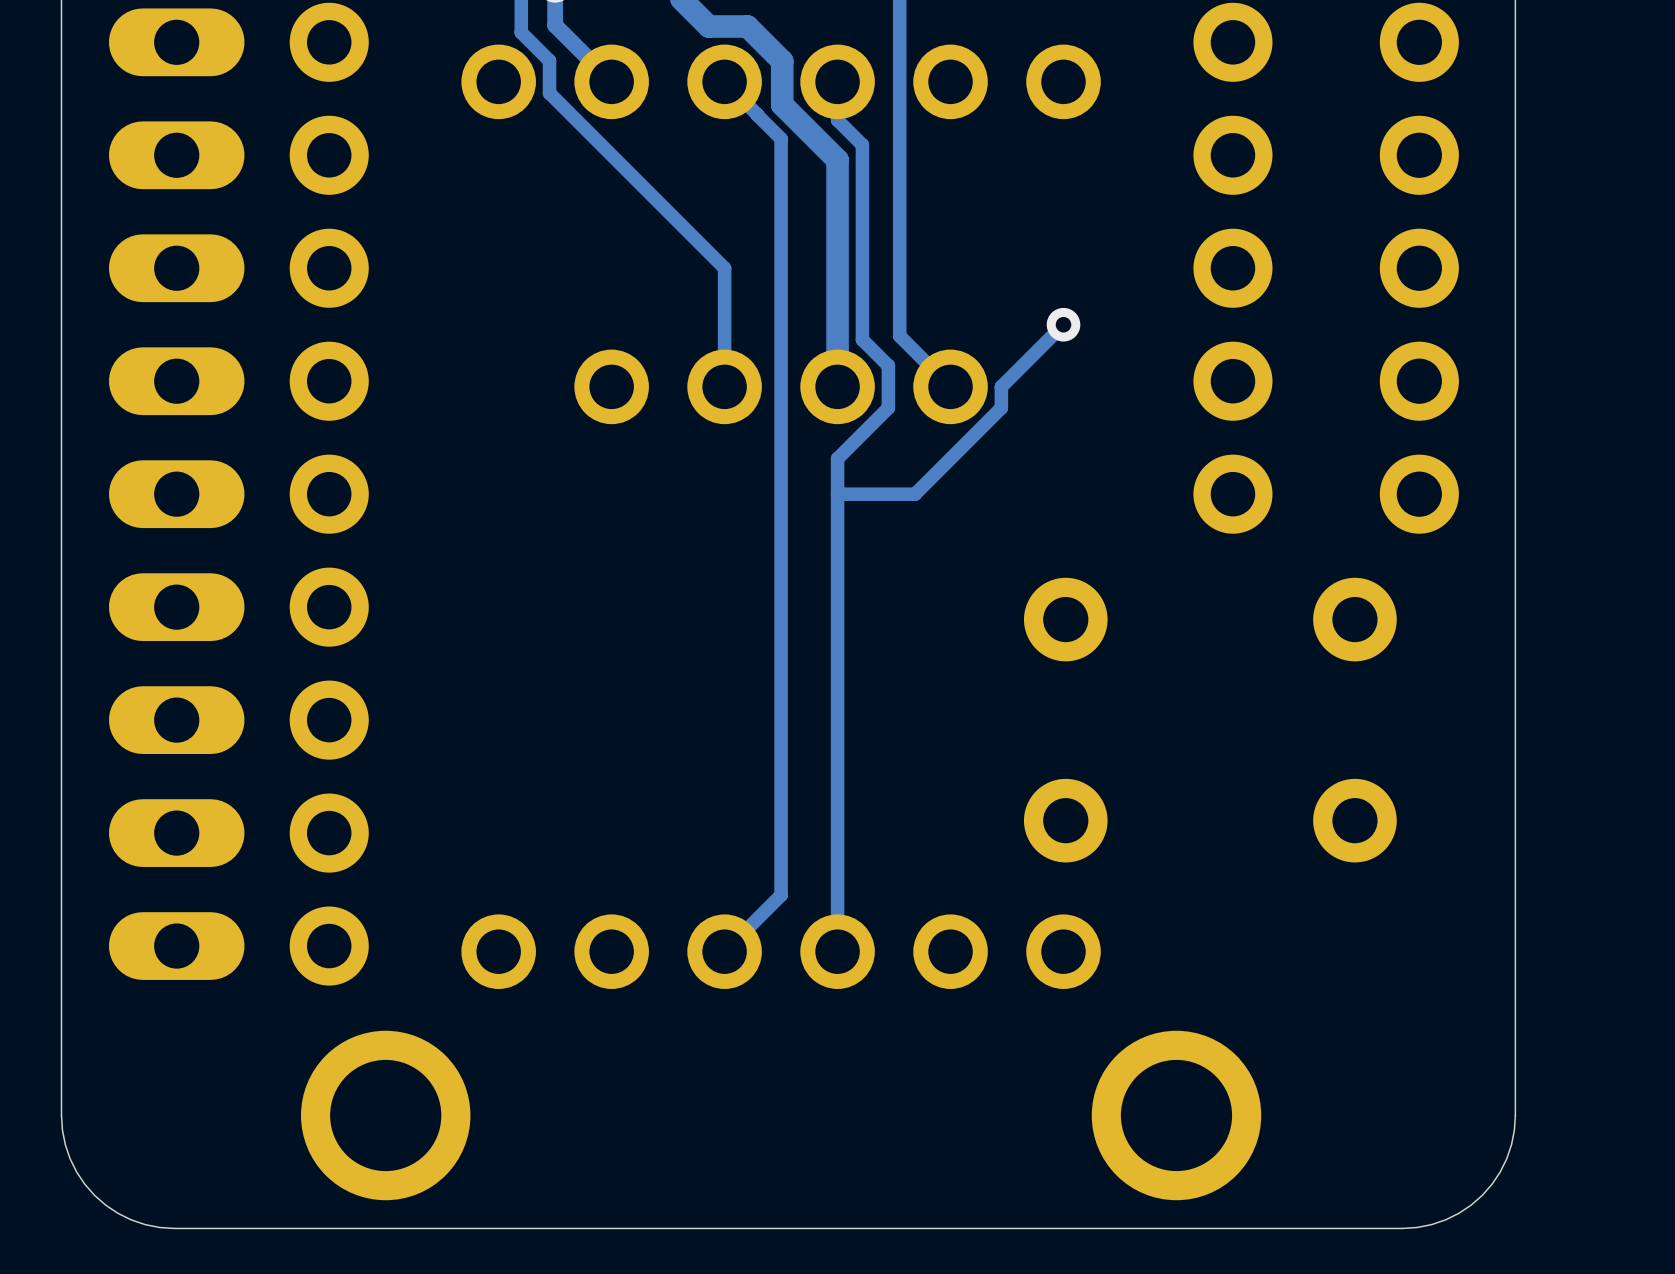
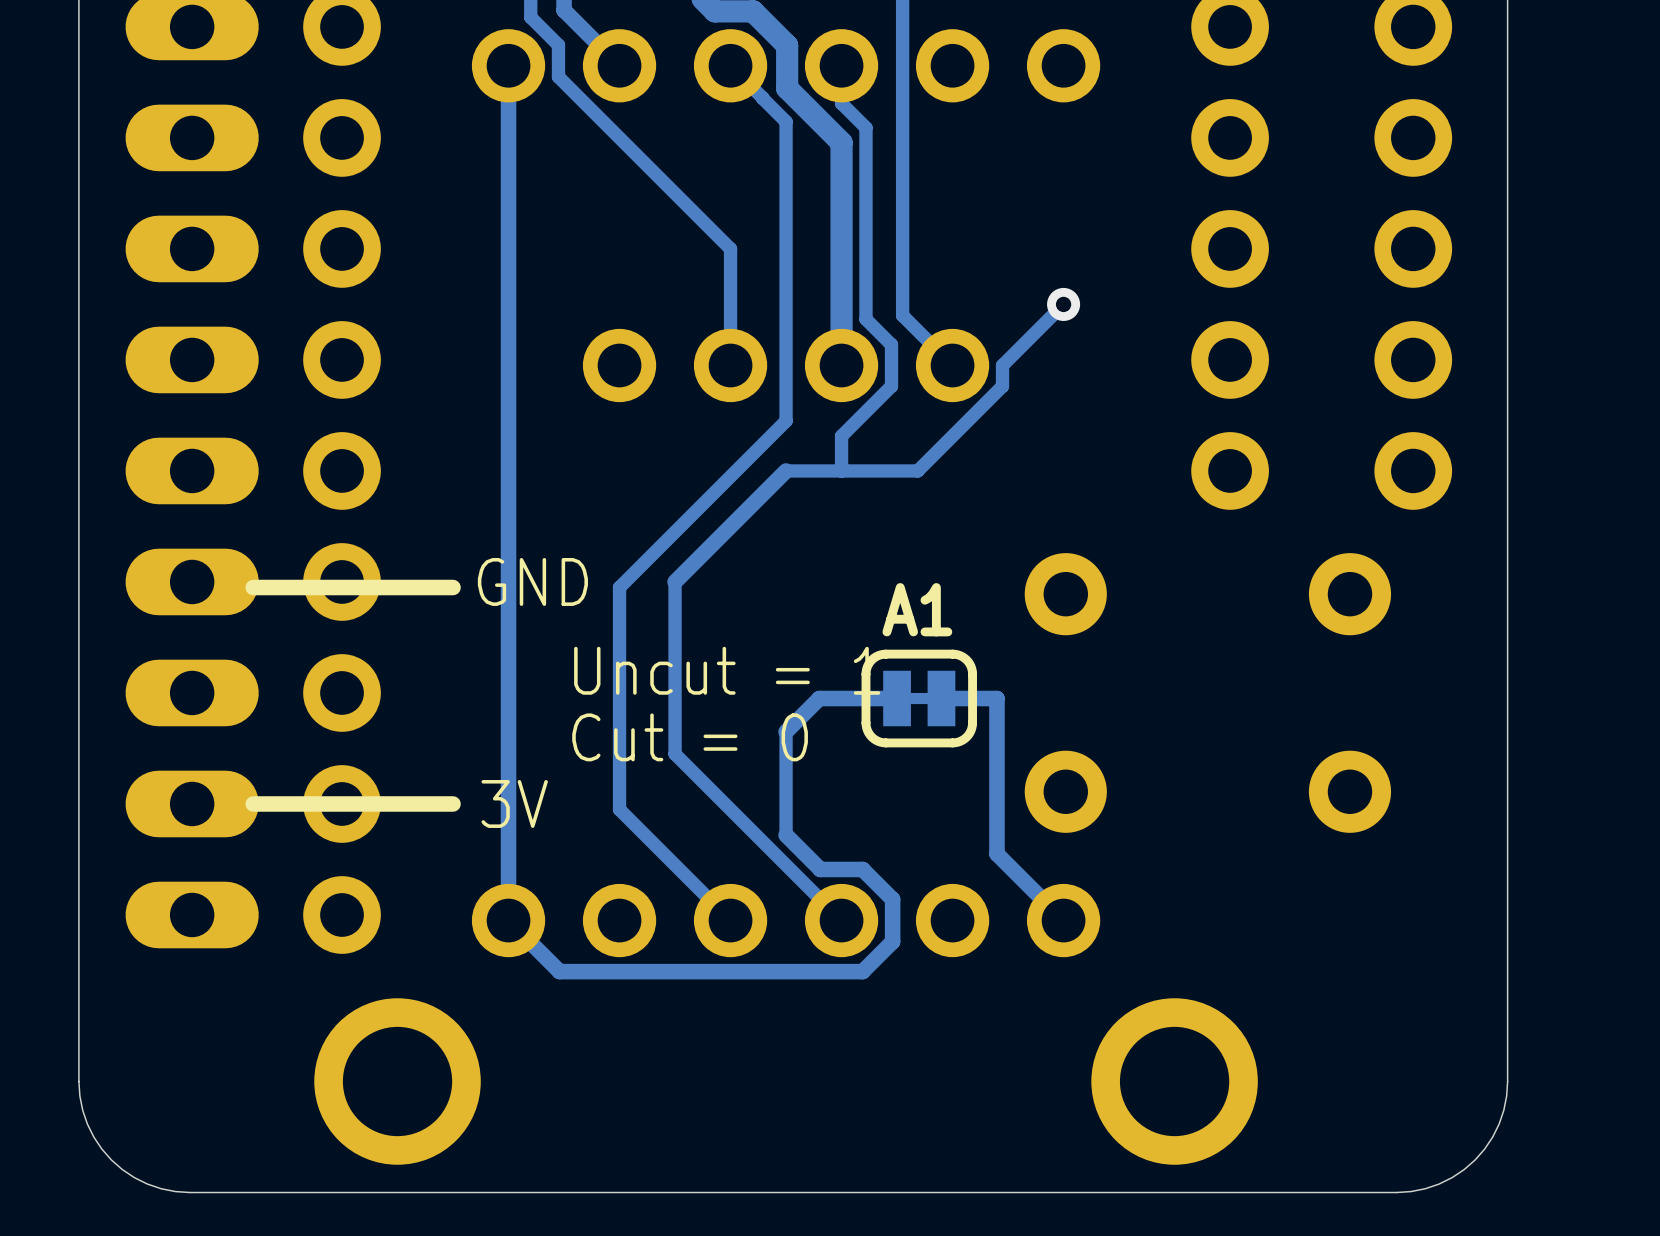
track: (781, 443) (781, 759) -> (786, 421) (619, 587) (619, 809) (730, 920)
track: (837, 494) (837, 951) -> (841, 470) (786, 470) (675, 581) (675, 754) (841, 920)
text: none -> GND (532, 581)
line: none -> (453, 587) (253, 587)
text: none -> Uncut = 1 (727, 670)
track: none -> (897, 698) (892, 702) (895, 698) (819, 698) (786, 731)
A1: none -> (919, 698)
track: none -> (941, 698) (996, 698) (996, 853) (1063, 920)
text: none -> Cut = 0 (690, 737)
line: none -> (453, 803) (253, 803)
text: none -> 3V (514, 803)
track: (781, 864) (781, 895) (724, 951) -> (786, 835) (820, 869) (862, 869) (892, 899) (892, 941) (862, 971) (559, 971) (508, 920) (508, 65)

